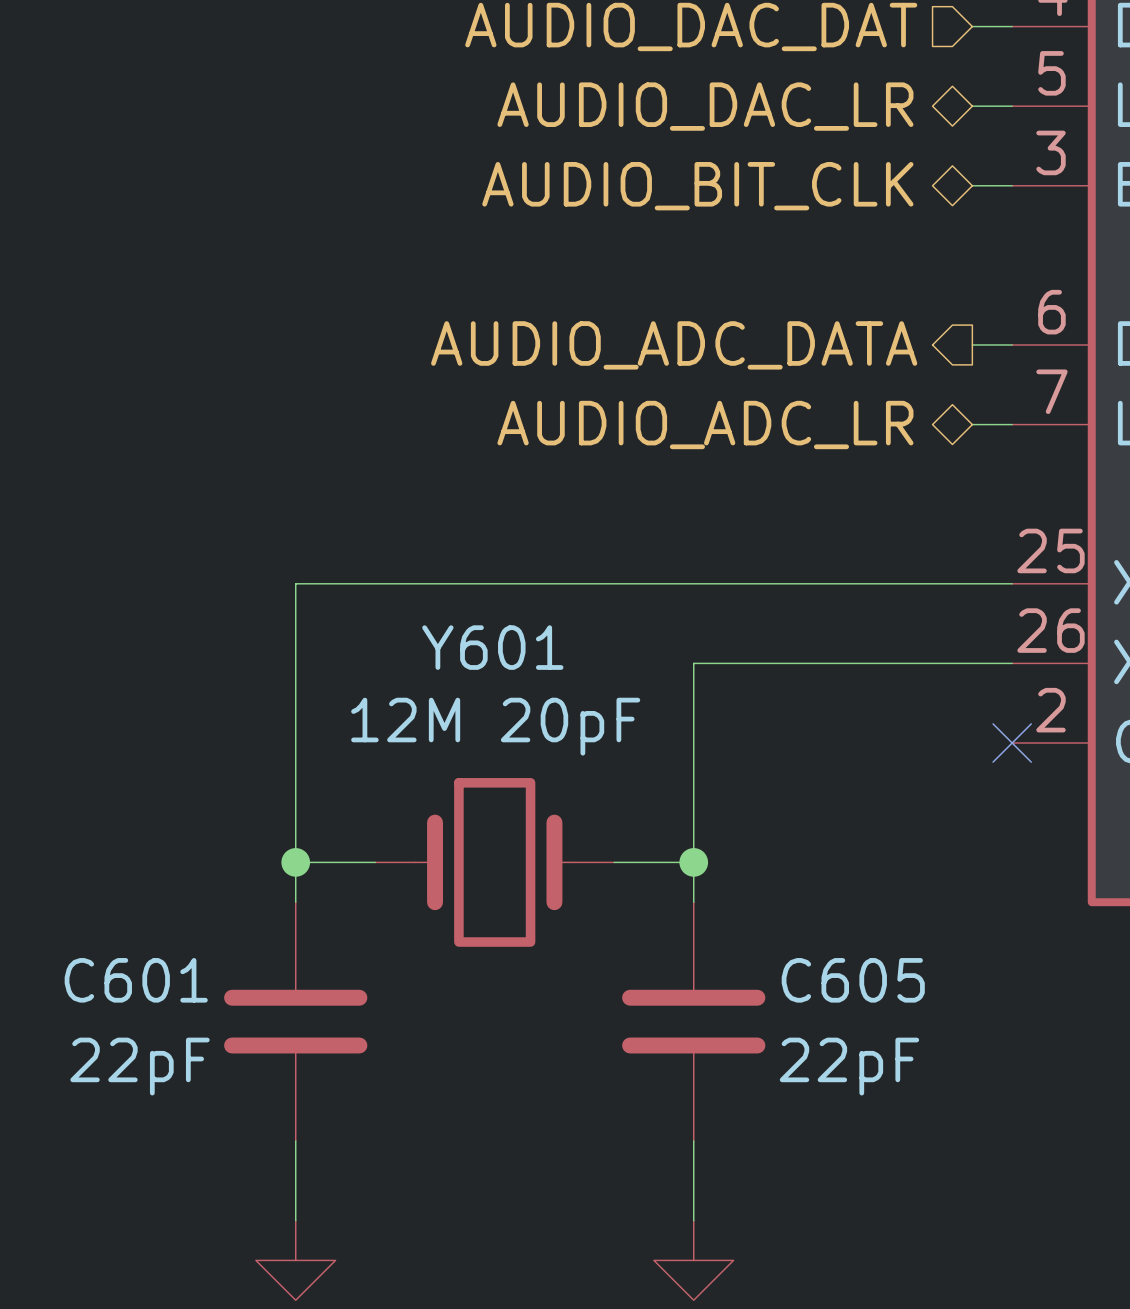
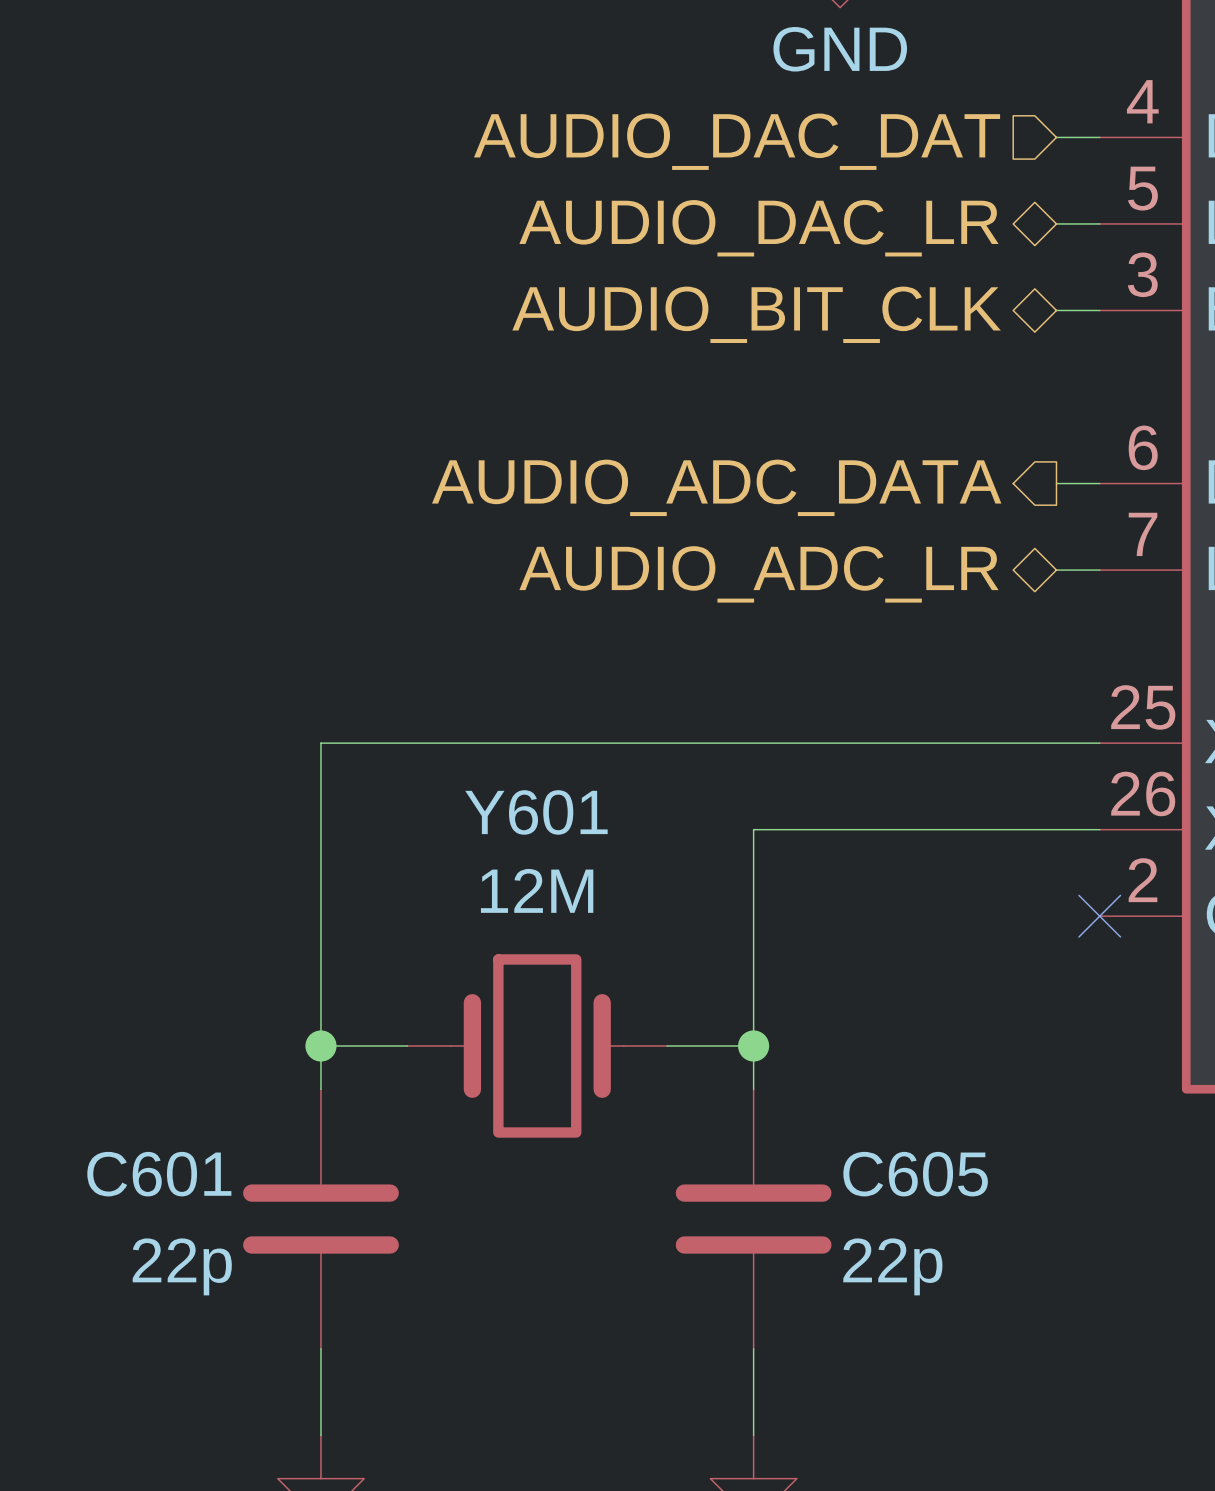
Y601 value: 12M 20pF (495, 726) -> 12M (537, 890)
C601 value: 22pF (140, 1066) -> 22p (182, 1266)
C605 value: 22pF (849, 1066) -> 22p (892, 1266)

